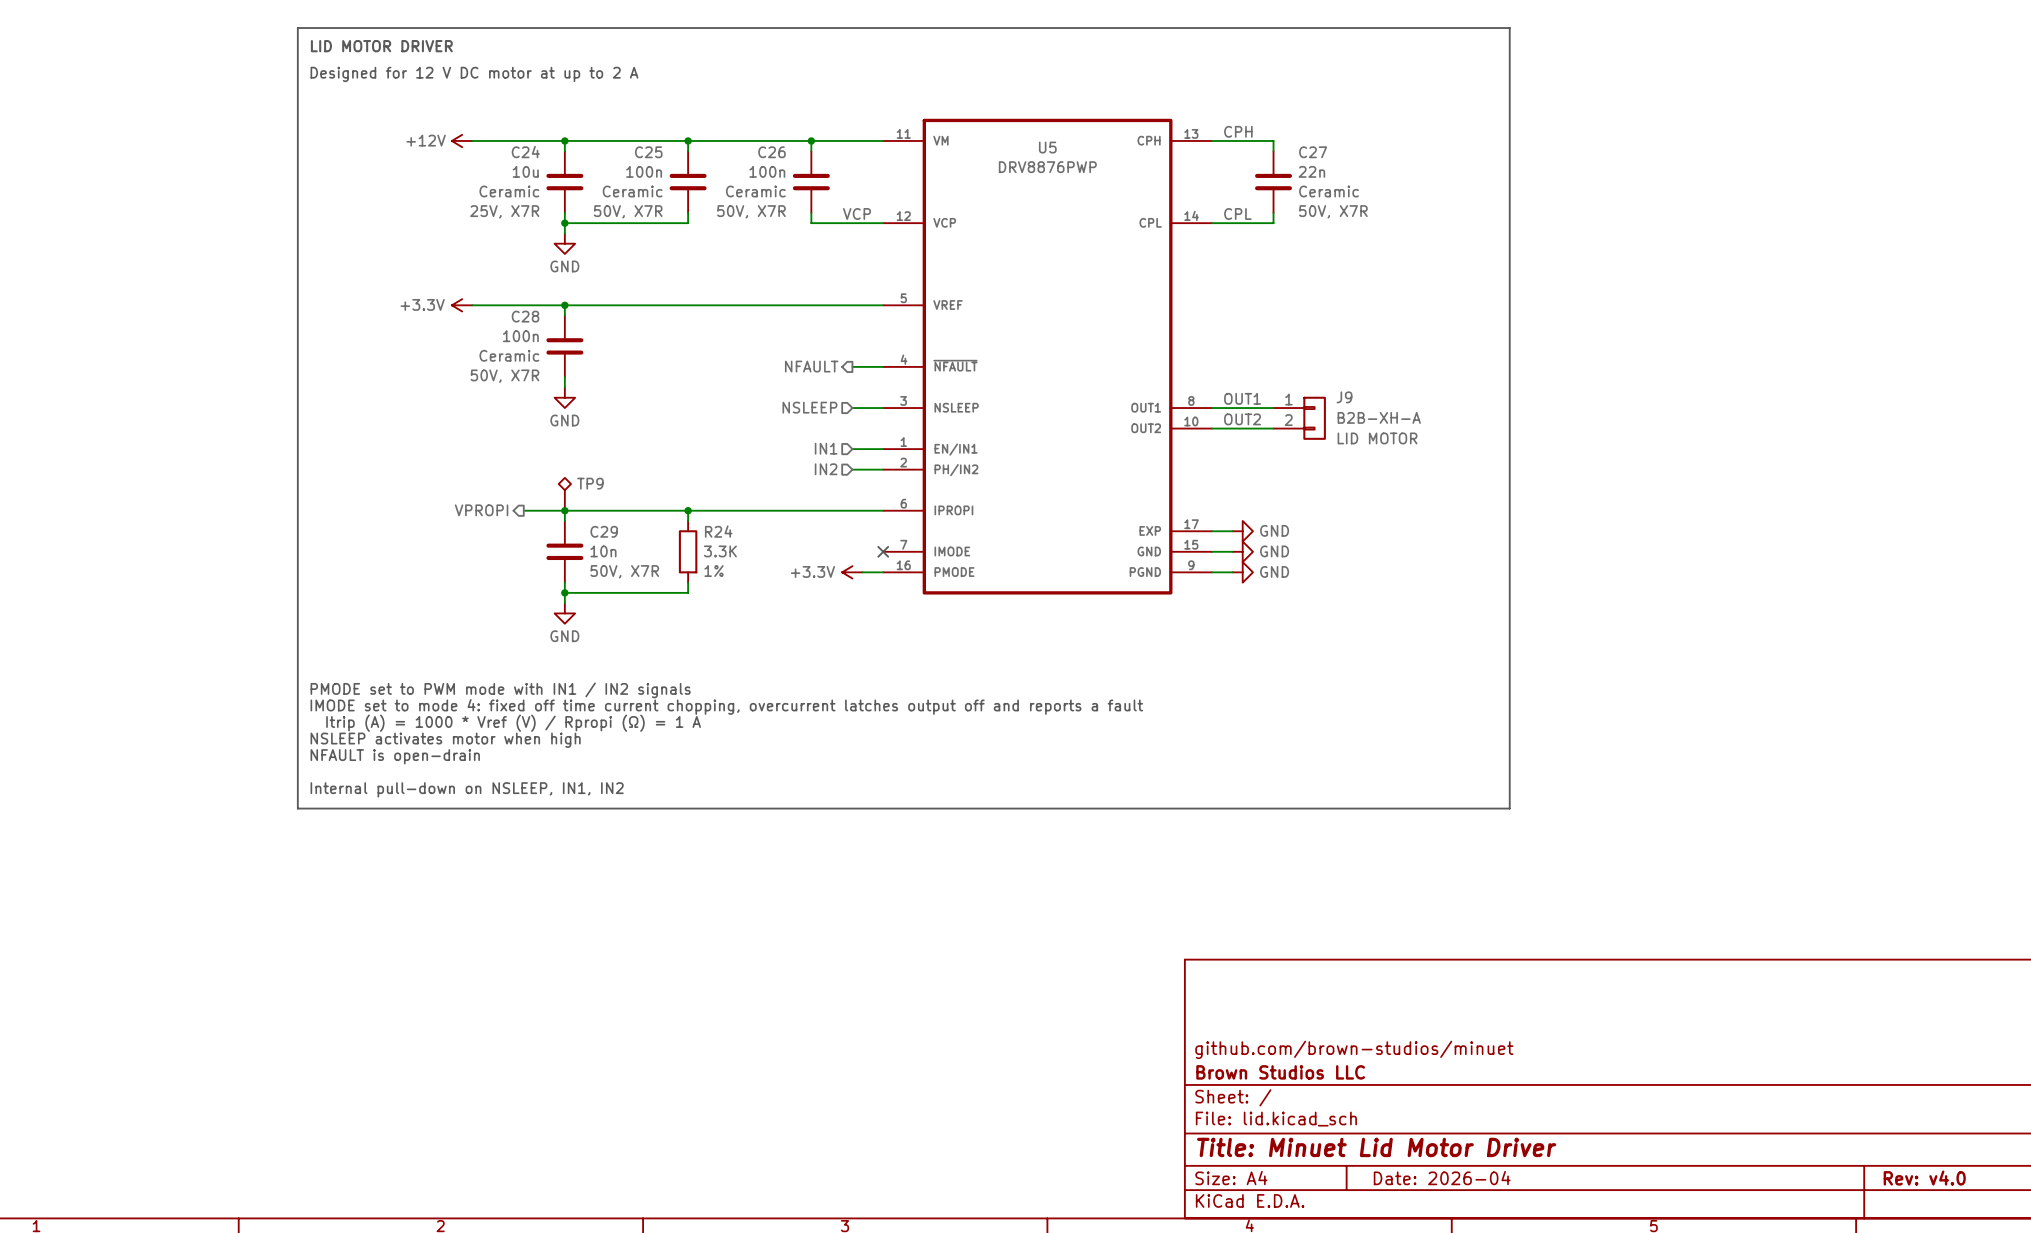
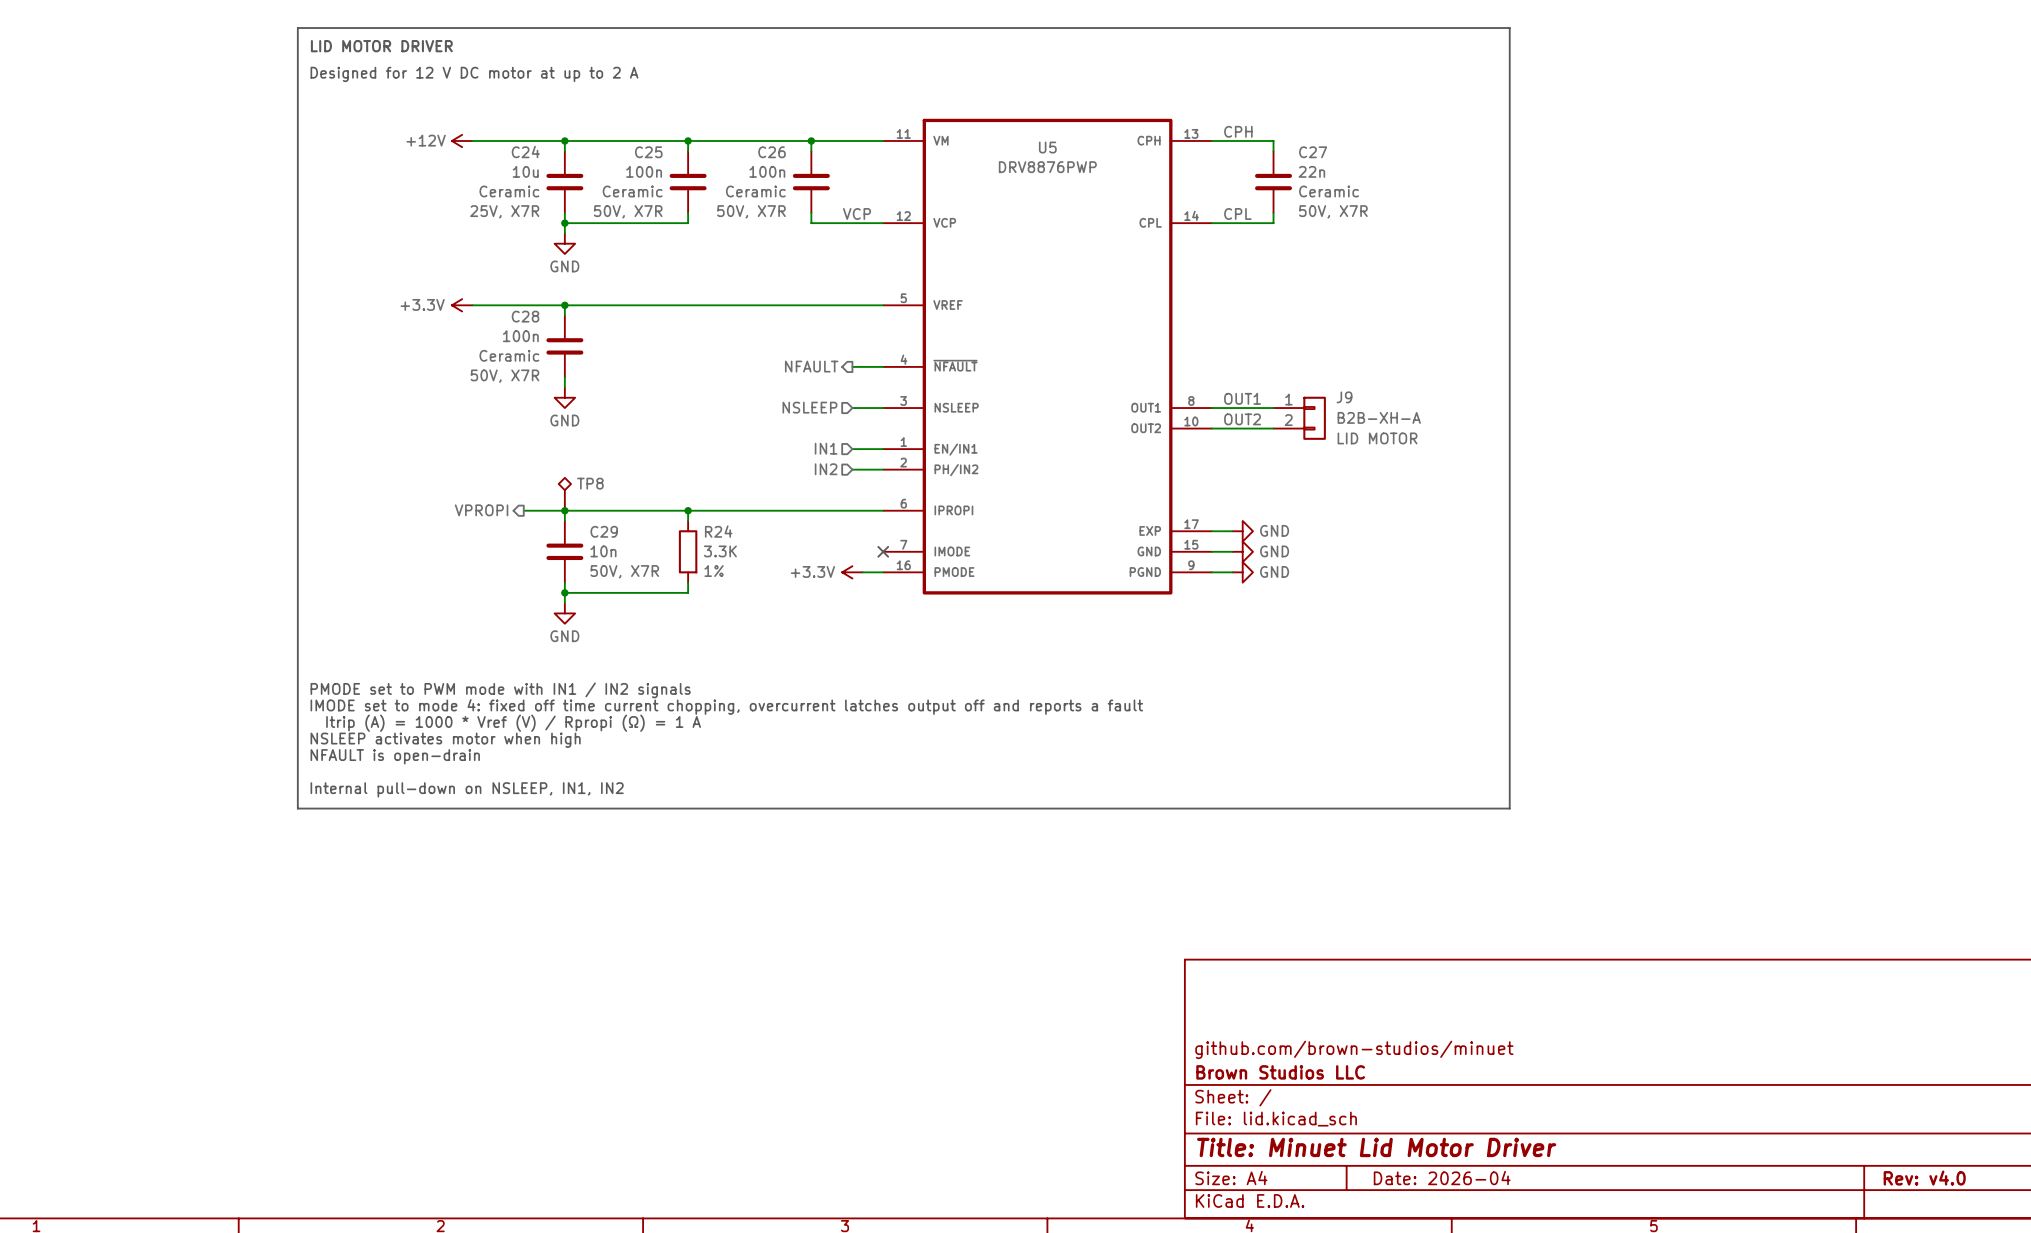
TP9 name: TP9 (590, 483) -> TP8 (590, 483)

